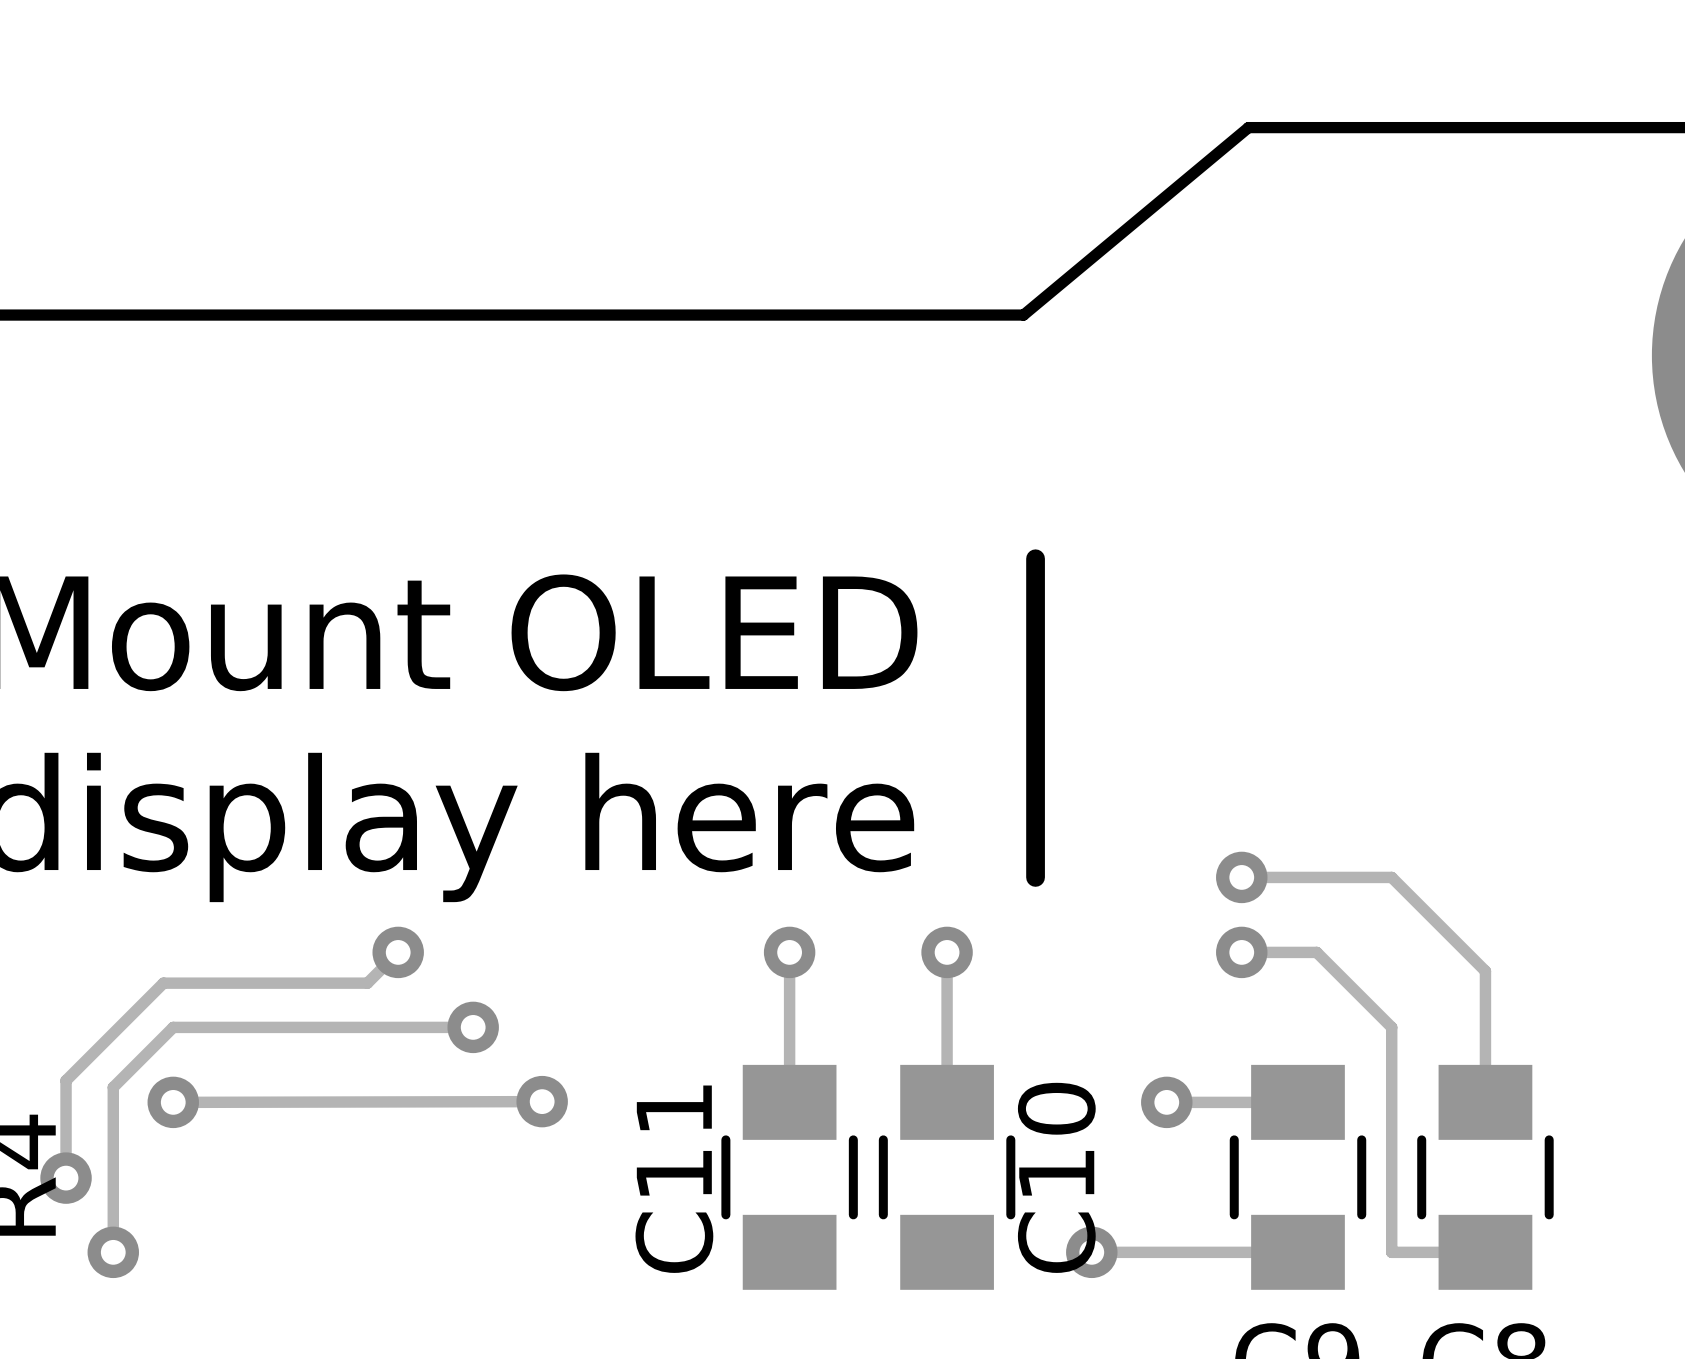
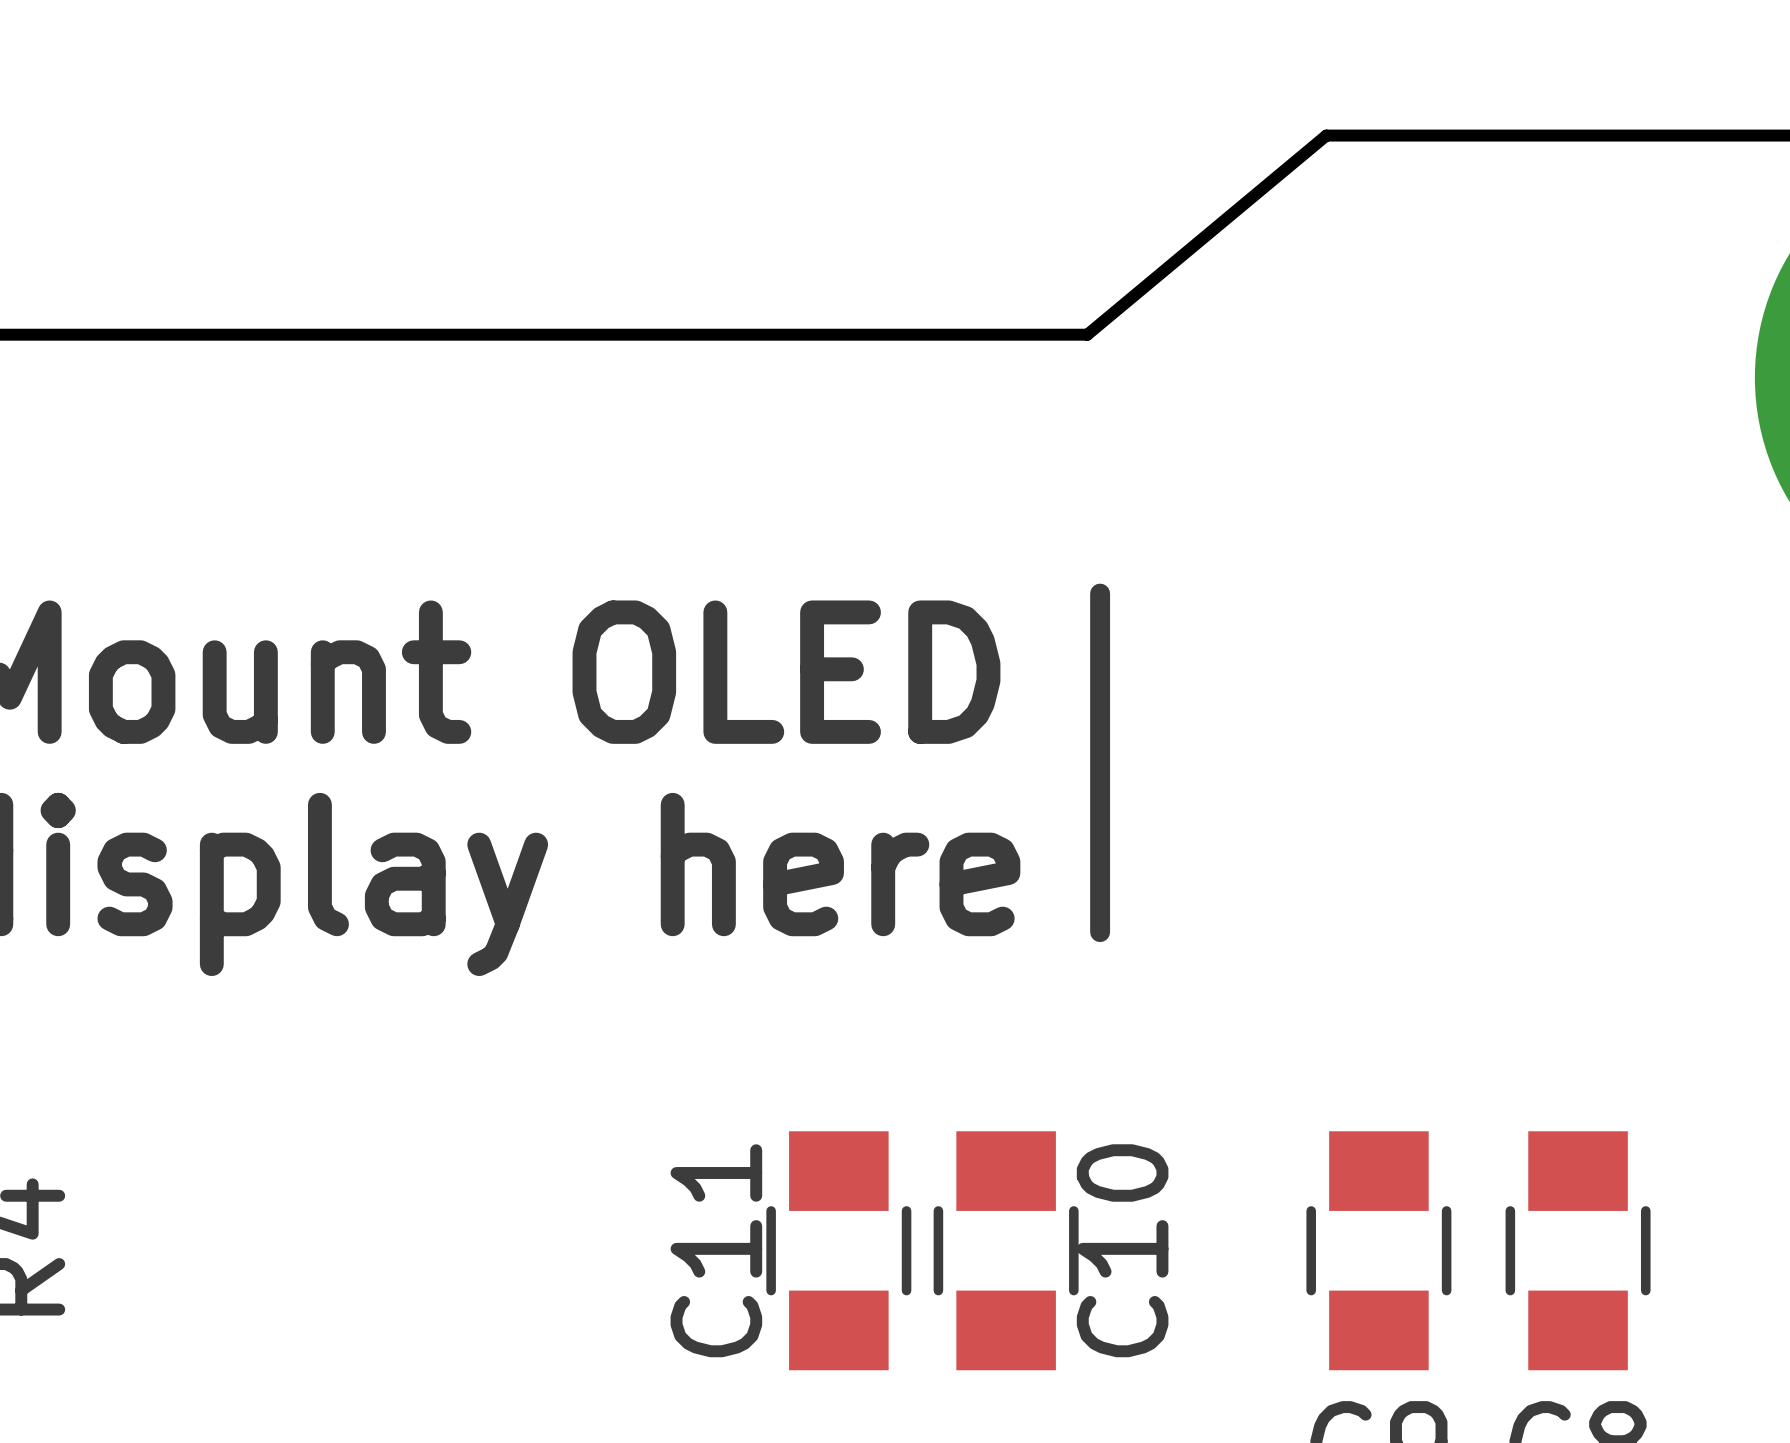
track: (1241, 877) (1391, 877) (1485, 971) (1485, 1102) -> none
via: (1241, 877) -> none
track: (398, 952) (367, 983) (163, 983) (66, 1080) (66, 1178) -> none
via: (398, 952) -> none
track: (789, 952) (789, 1102) -> none
via: (789, 952) -> none
track: (947, 952) (947, 1102) -> none
via: (947, 952) -> none
track: (1241, 952) (1316, 952) (1391, 1027) (1391, 1252) (1485, 1252) -> none
via: (1241, 952) -> none
track: (473, 1027) (173, 1027) (113, 1087) (113, 1252) -> none
via: (473, 1027) -> none
track: (542, 1101) (173, 1102) -> none
via: (542, 1101) -> none
via: (173, 1102) -> none
track: (1166, 1102) (1297, 1102) -> none
via: (1166, 1102) -> none
via: (66, 1178) -> none
via: (113, 1252) -> none
track: (1091, 1252) (1297, 1252) -> none
via: (1091, 1252) -> none

